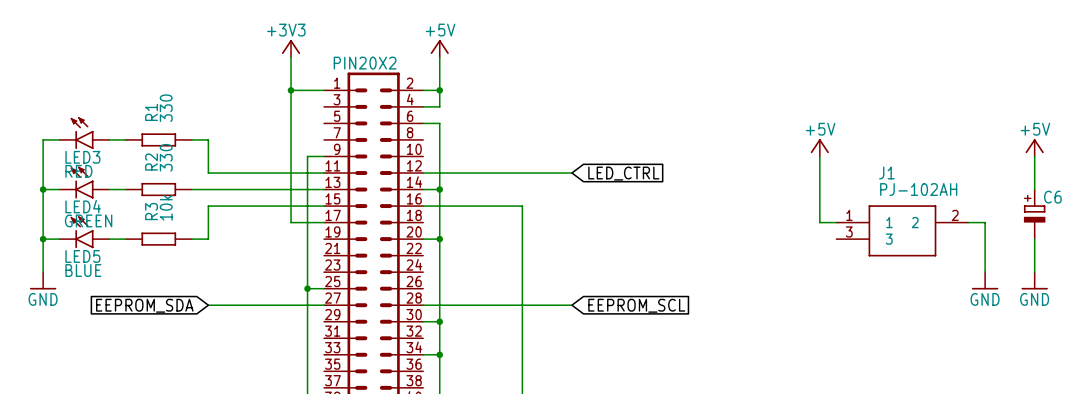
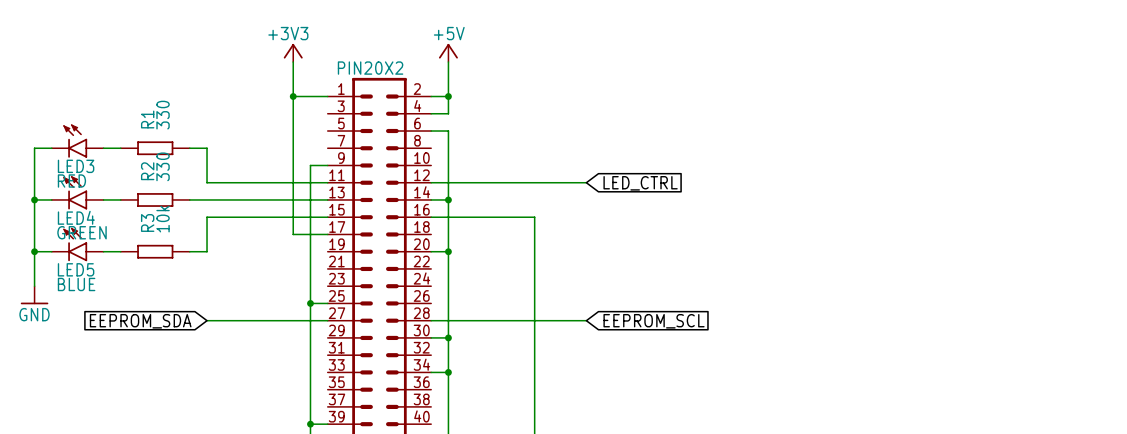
power symbol: +5V (819, 147) -> none
power symbol: +5V (1034, 147) -> none
wire: (819, 156) (819, 222) (836, 222) -> none
wire: (1034, 156) (1034, 189) -> none
C6: (1034, 214) -> none
wire: (968, 222) (985, 222) (985, 272) -> none
J1: PJ-102AH (902, 230) -> none
wire: (1034, 239) (1034, 272) -> none
power symbol: GND (985, 280) -> none
power symbol: GND (1034, 280) -> none

